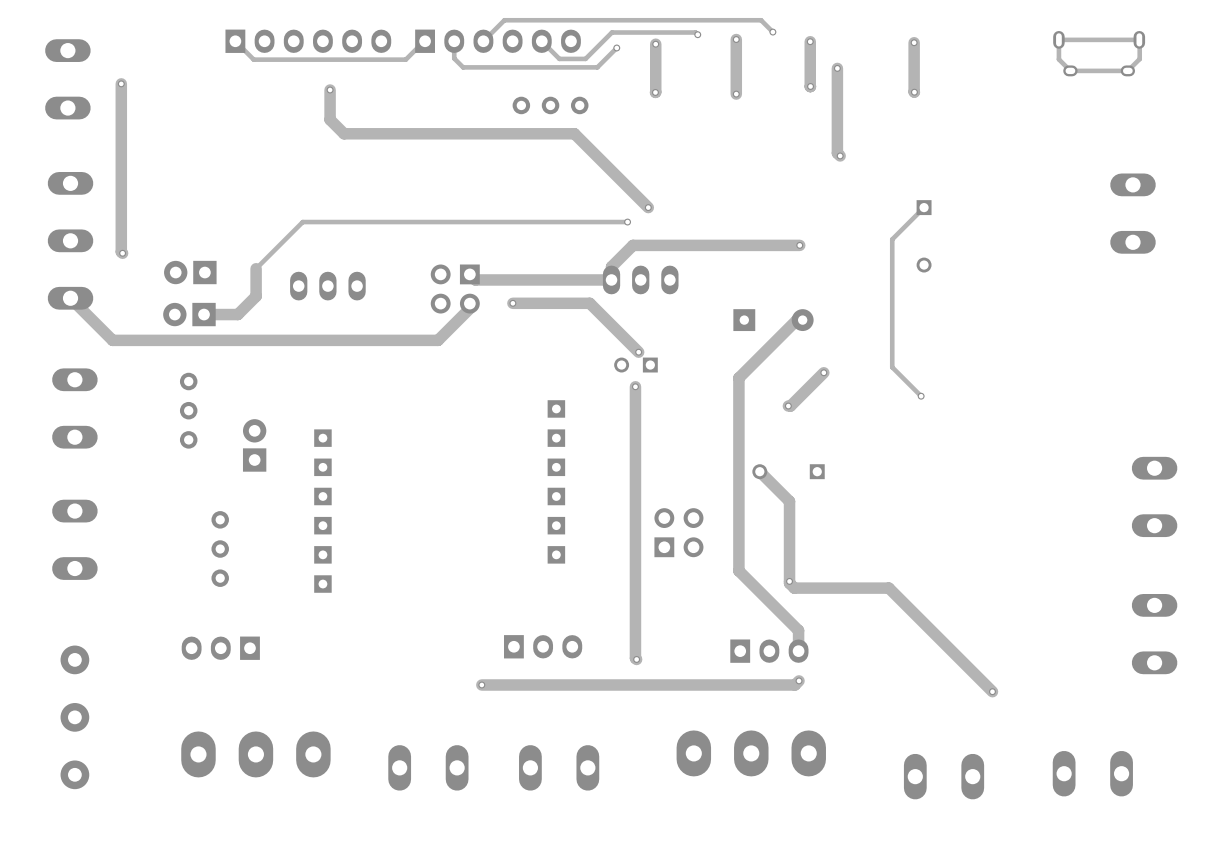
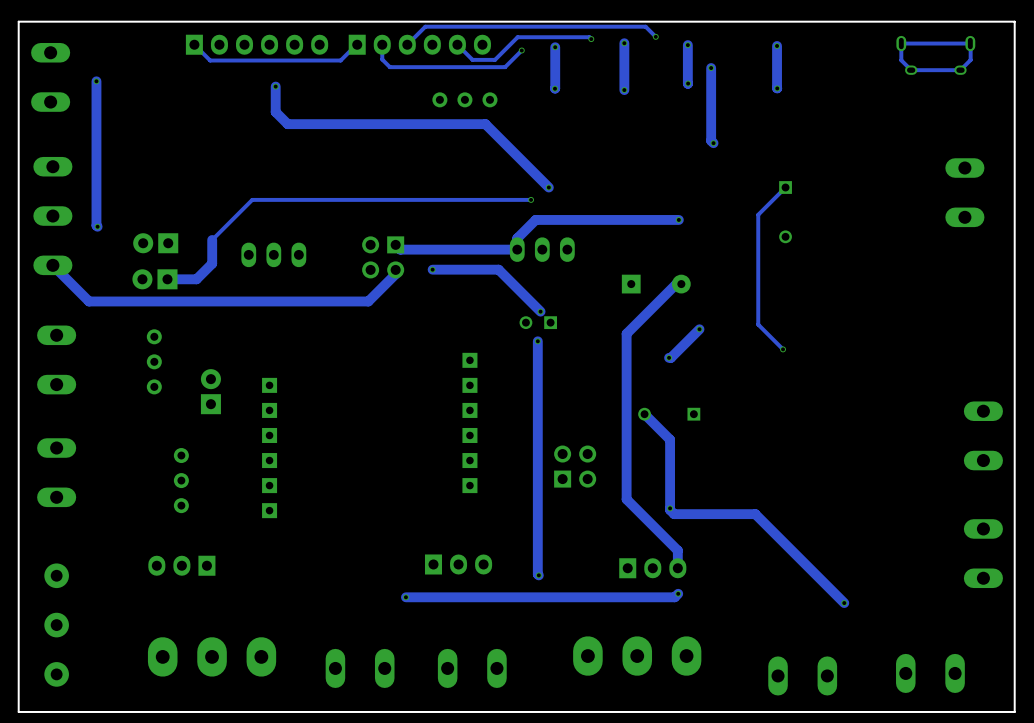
board edge: none -> (1014, 21) (18, 21) (18, 711) (1014, 711) (1014, 21)

